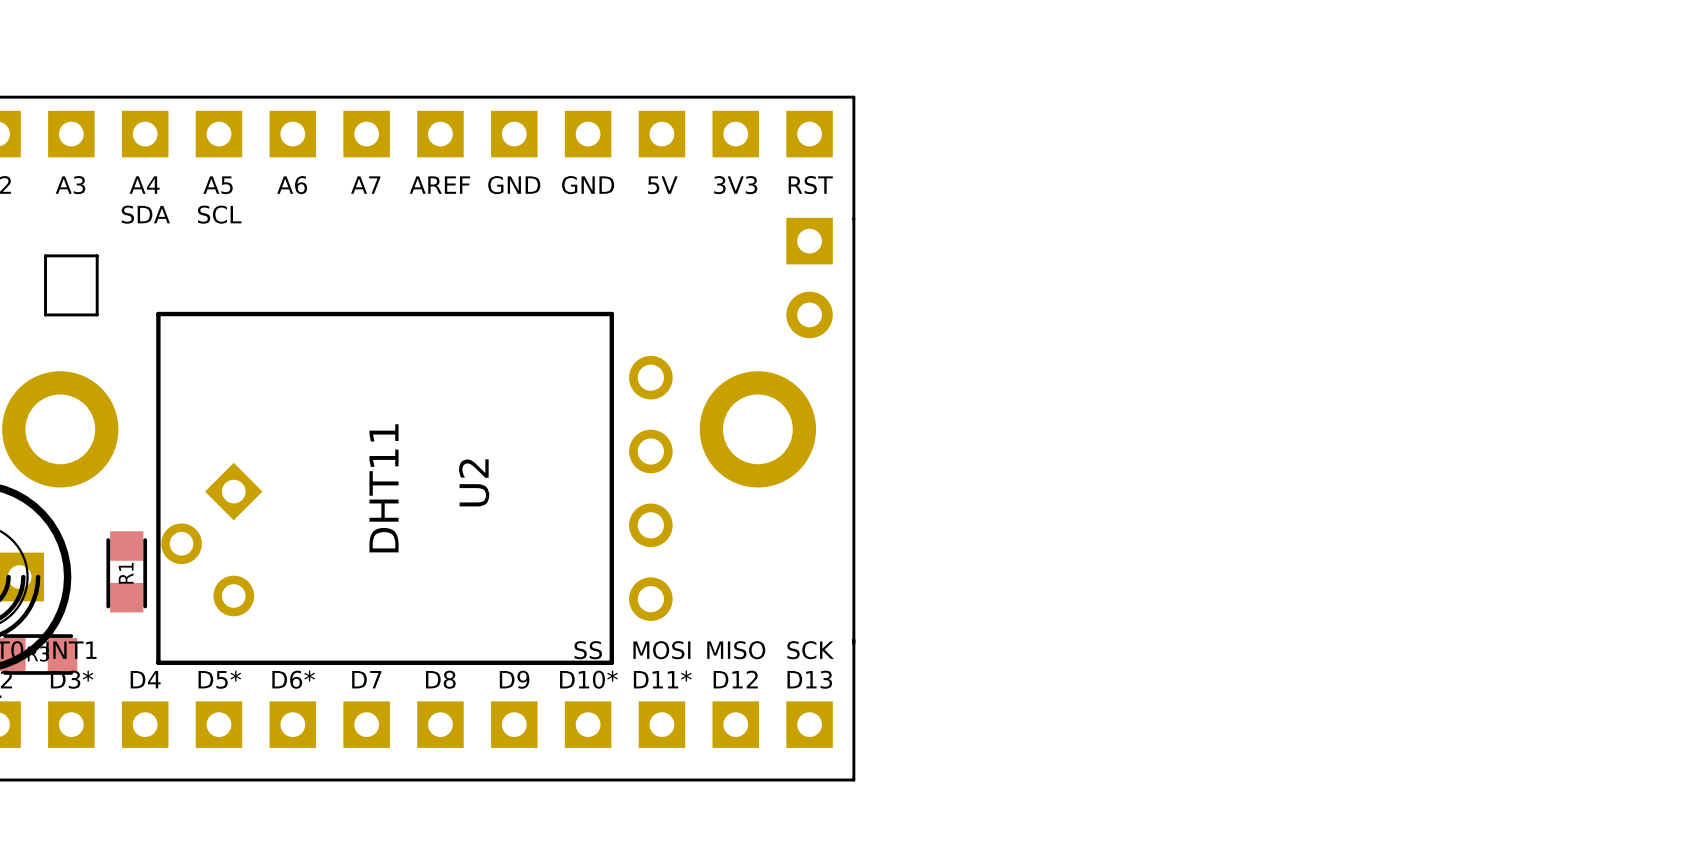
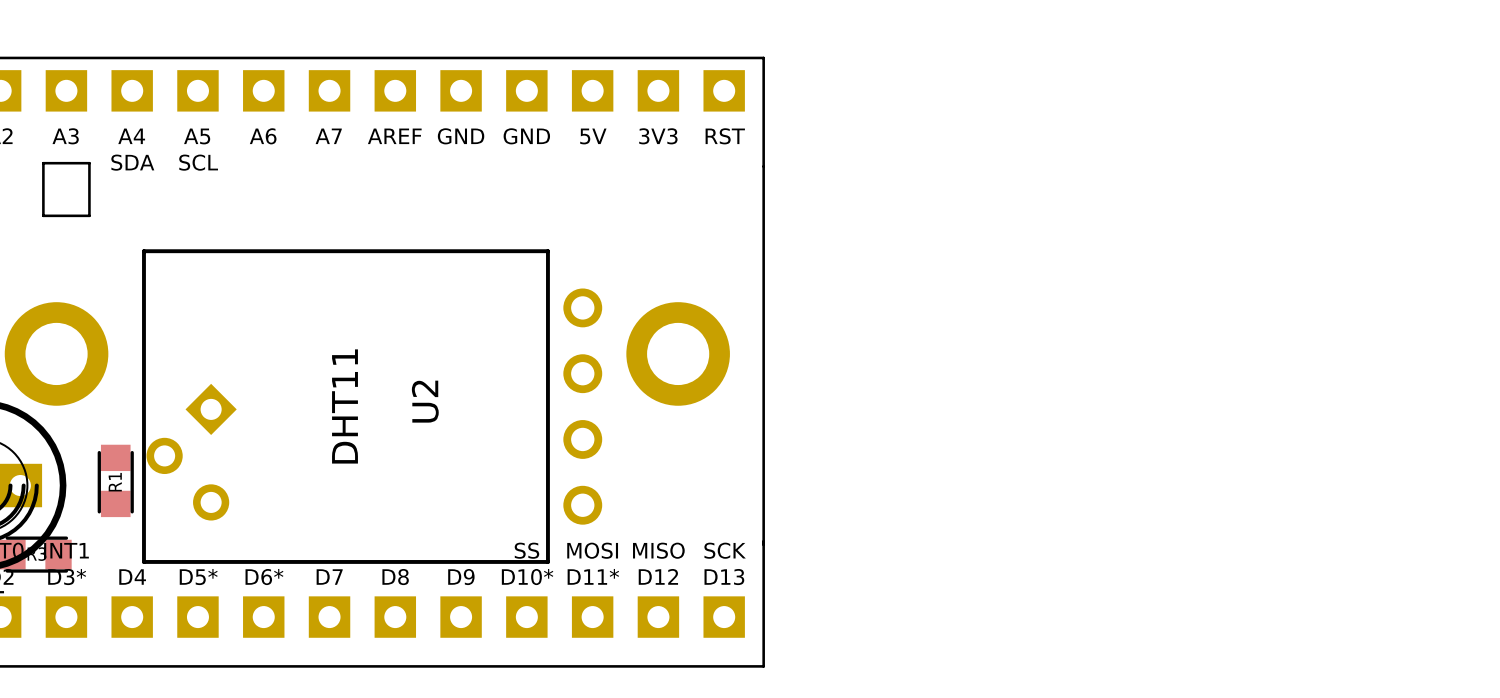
board edge: (45, 255) (97, 255) -> (43, 199) (43, 163) (89, 163) (89, 199)
board edge: (45, 274) (45, 314) (97, 314) (97, 274) -> (43, 215) (89, 215)
part: (809, 278) -> none

